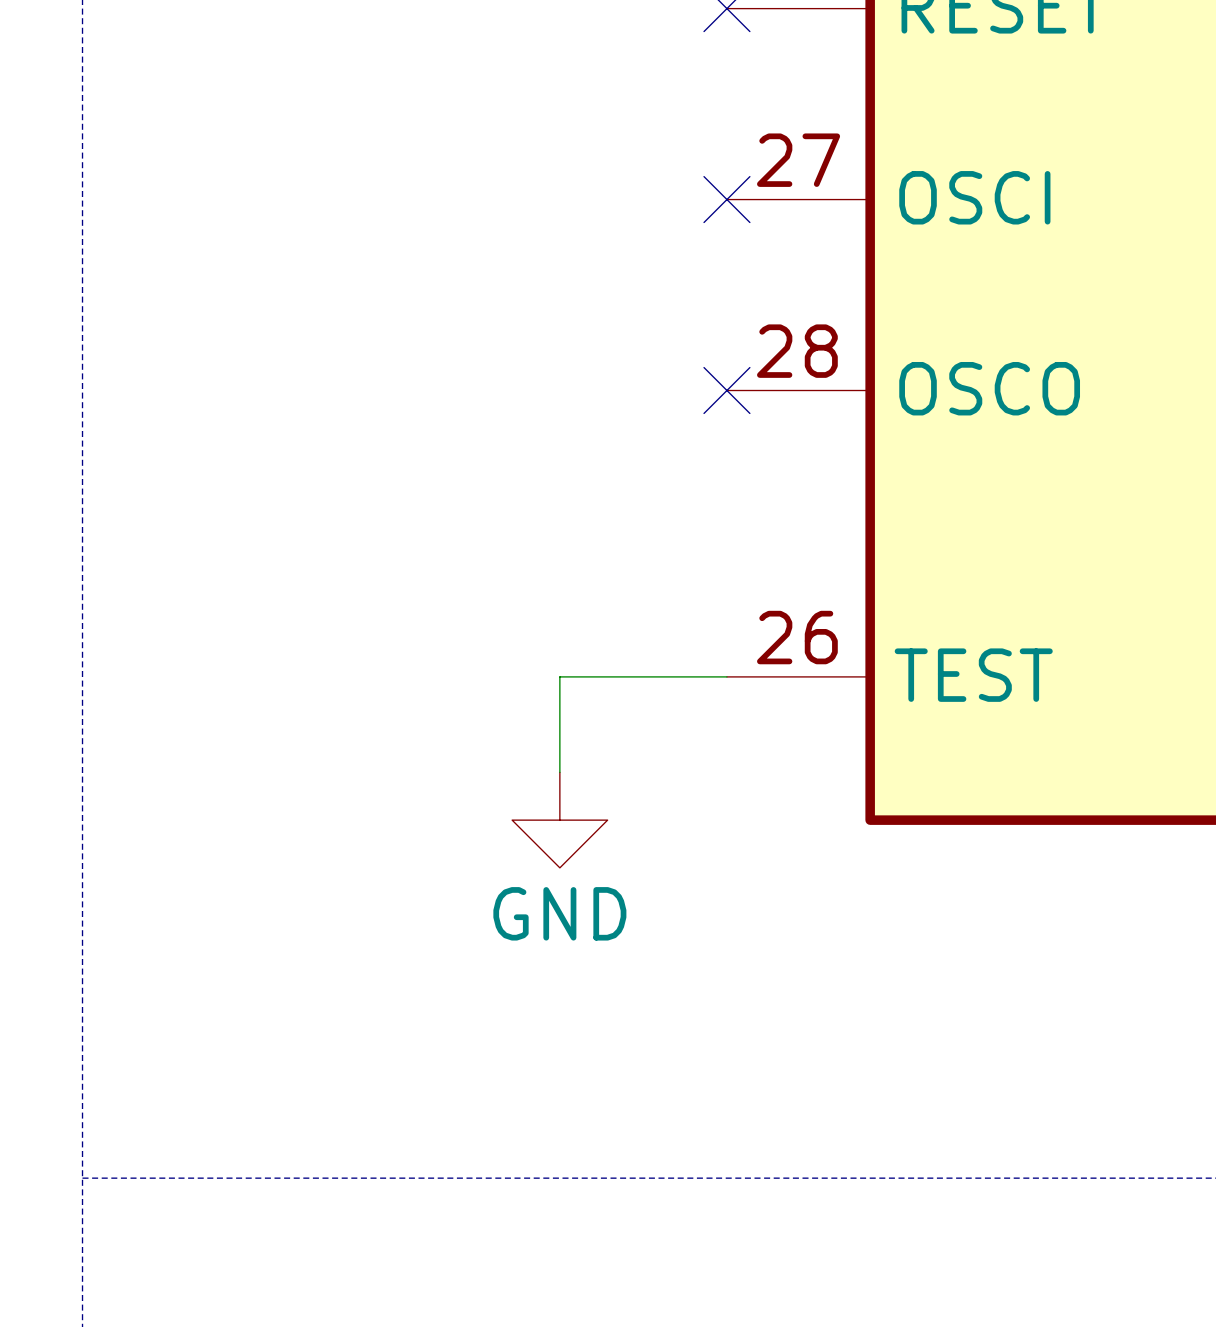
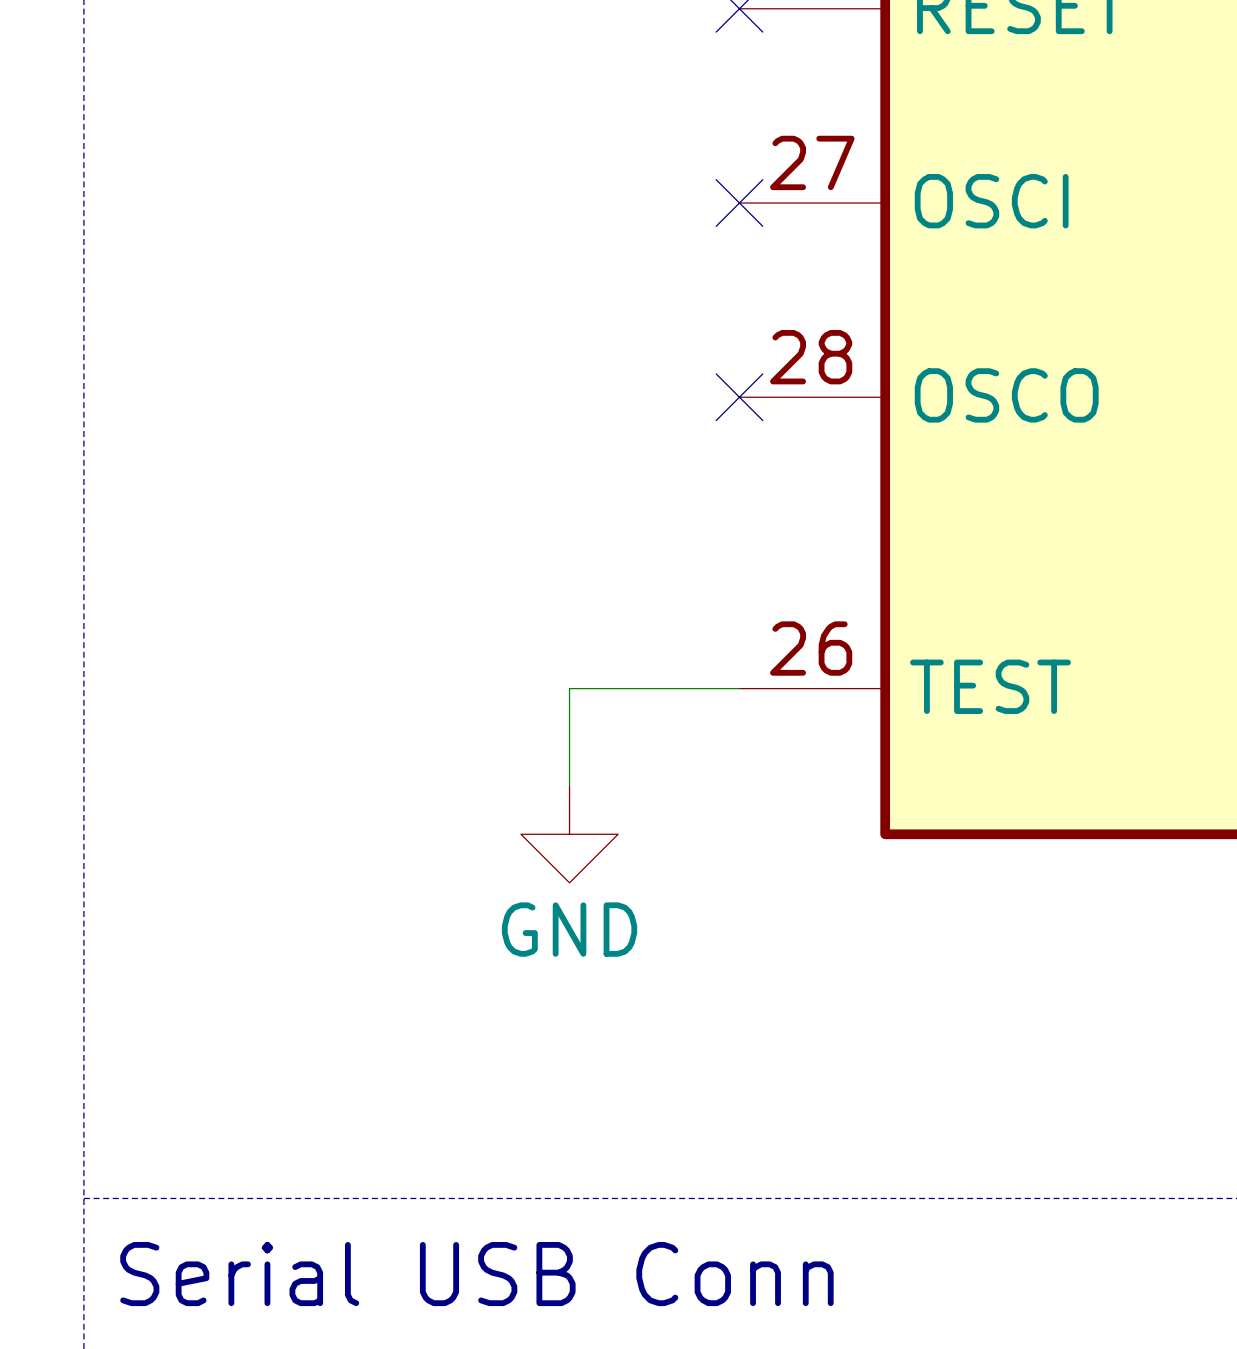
text: none -> Serial USB Conn (476, 1274)

